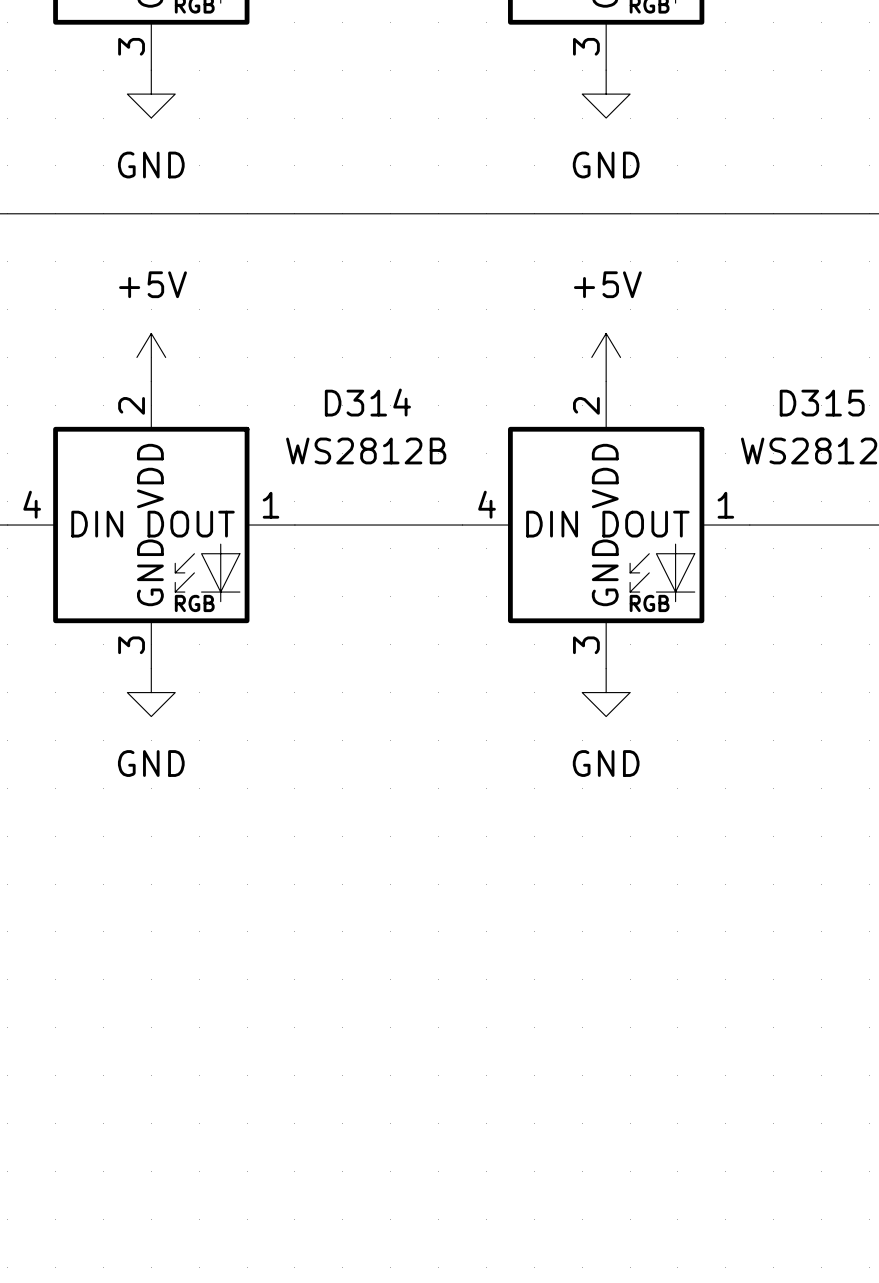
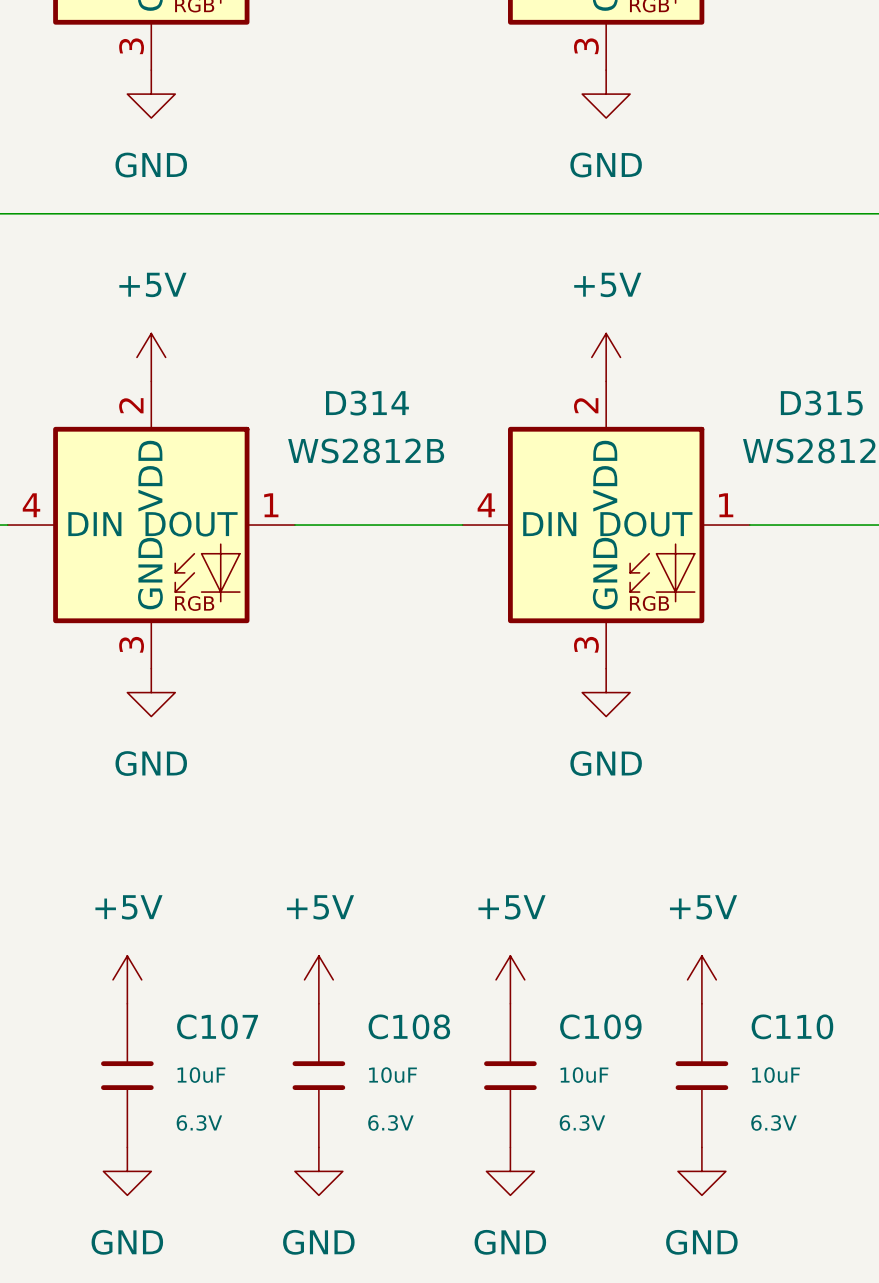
power symbol: none -> +5V (127, 979)
power symbol: none -> +5V (318, 979)
power symbol: none -> +5V (510, 979)
power symbol: none -> +5V (701, 979)
C107: none -> 10uF (127, 1075)
C108: none -> 10uF (318, 1075)
C109: none -> 10uF (510, 1075)
C110: none -> 10uF (701, 1075)
power symbol: none -> GND (127, 1171)
power symbol: none -> GND (318, 1171)
power symbol: none -> GND (510, 1171)
power symbol: none -> GND (701, 1171)

